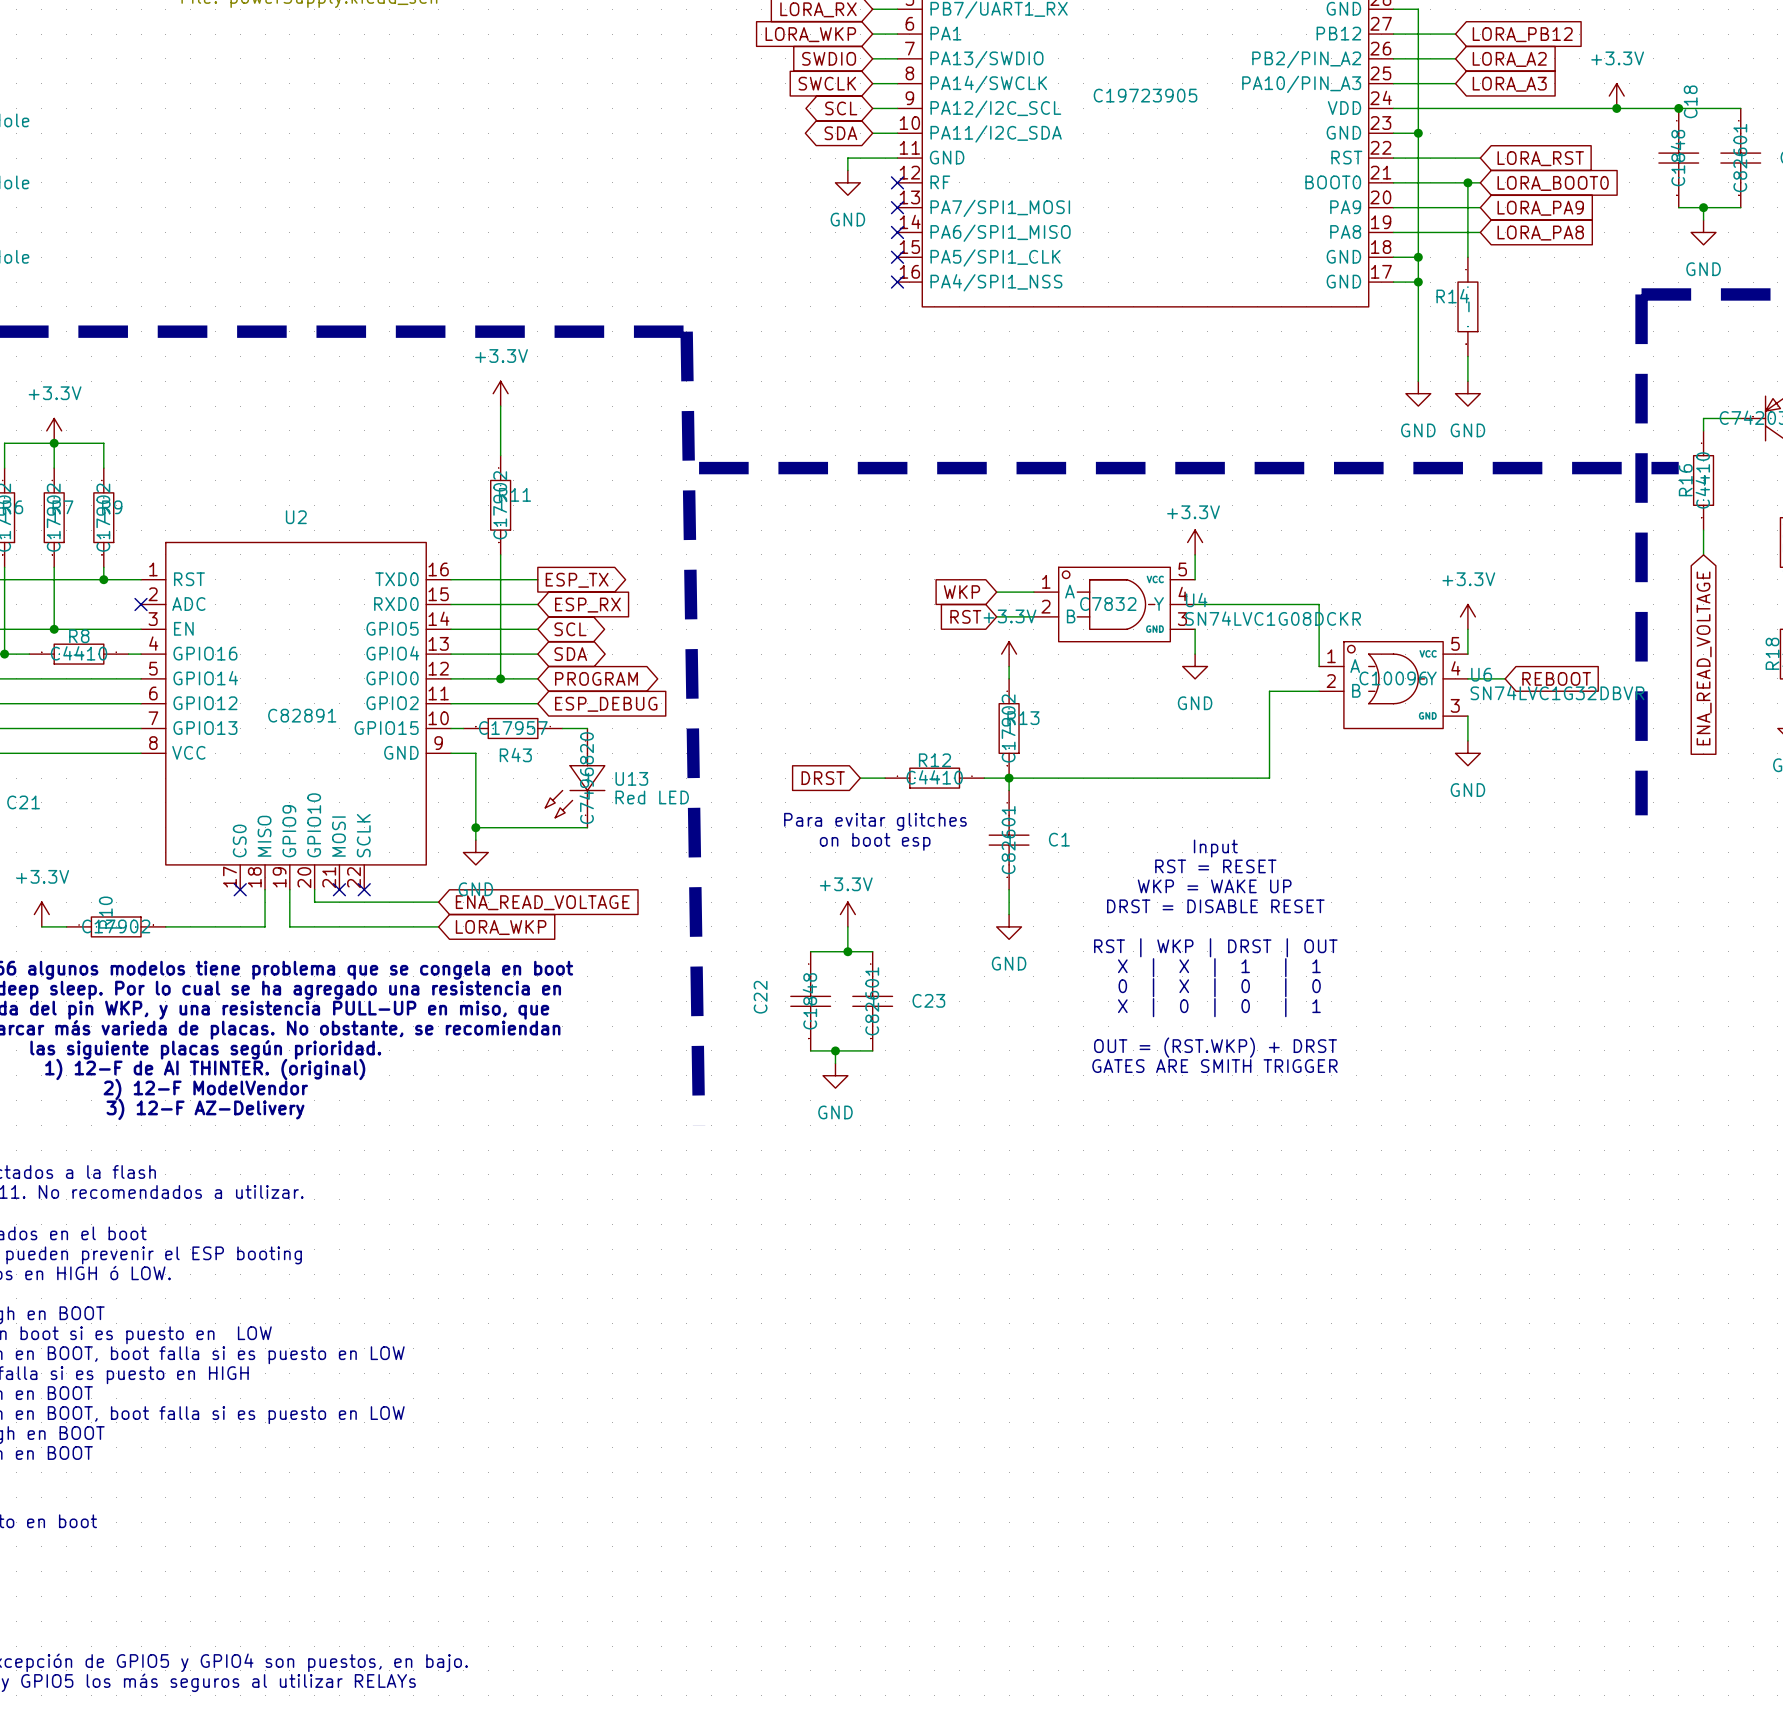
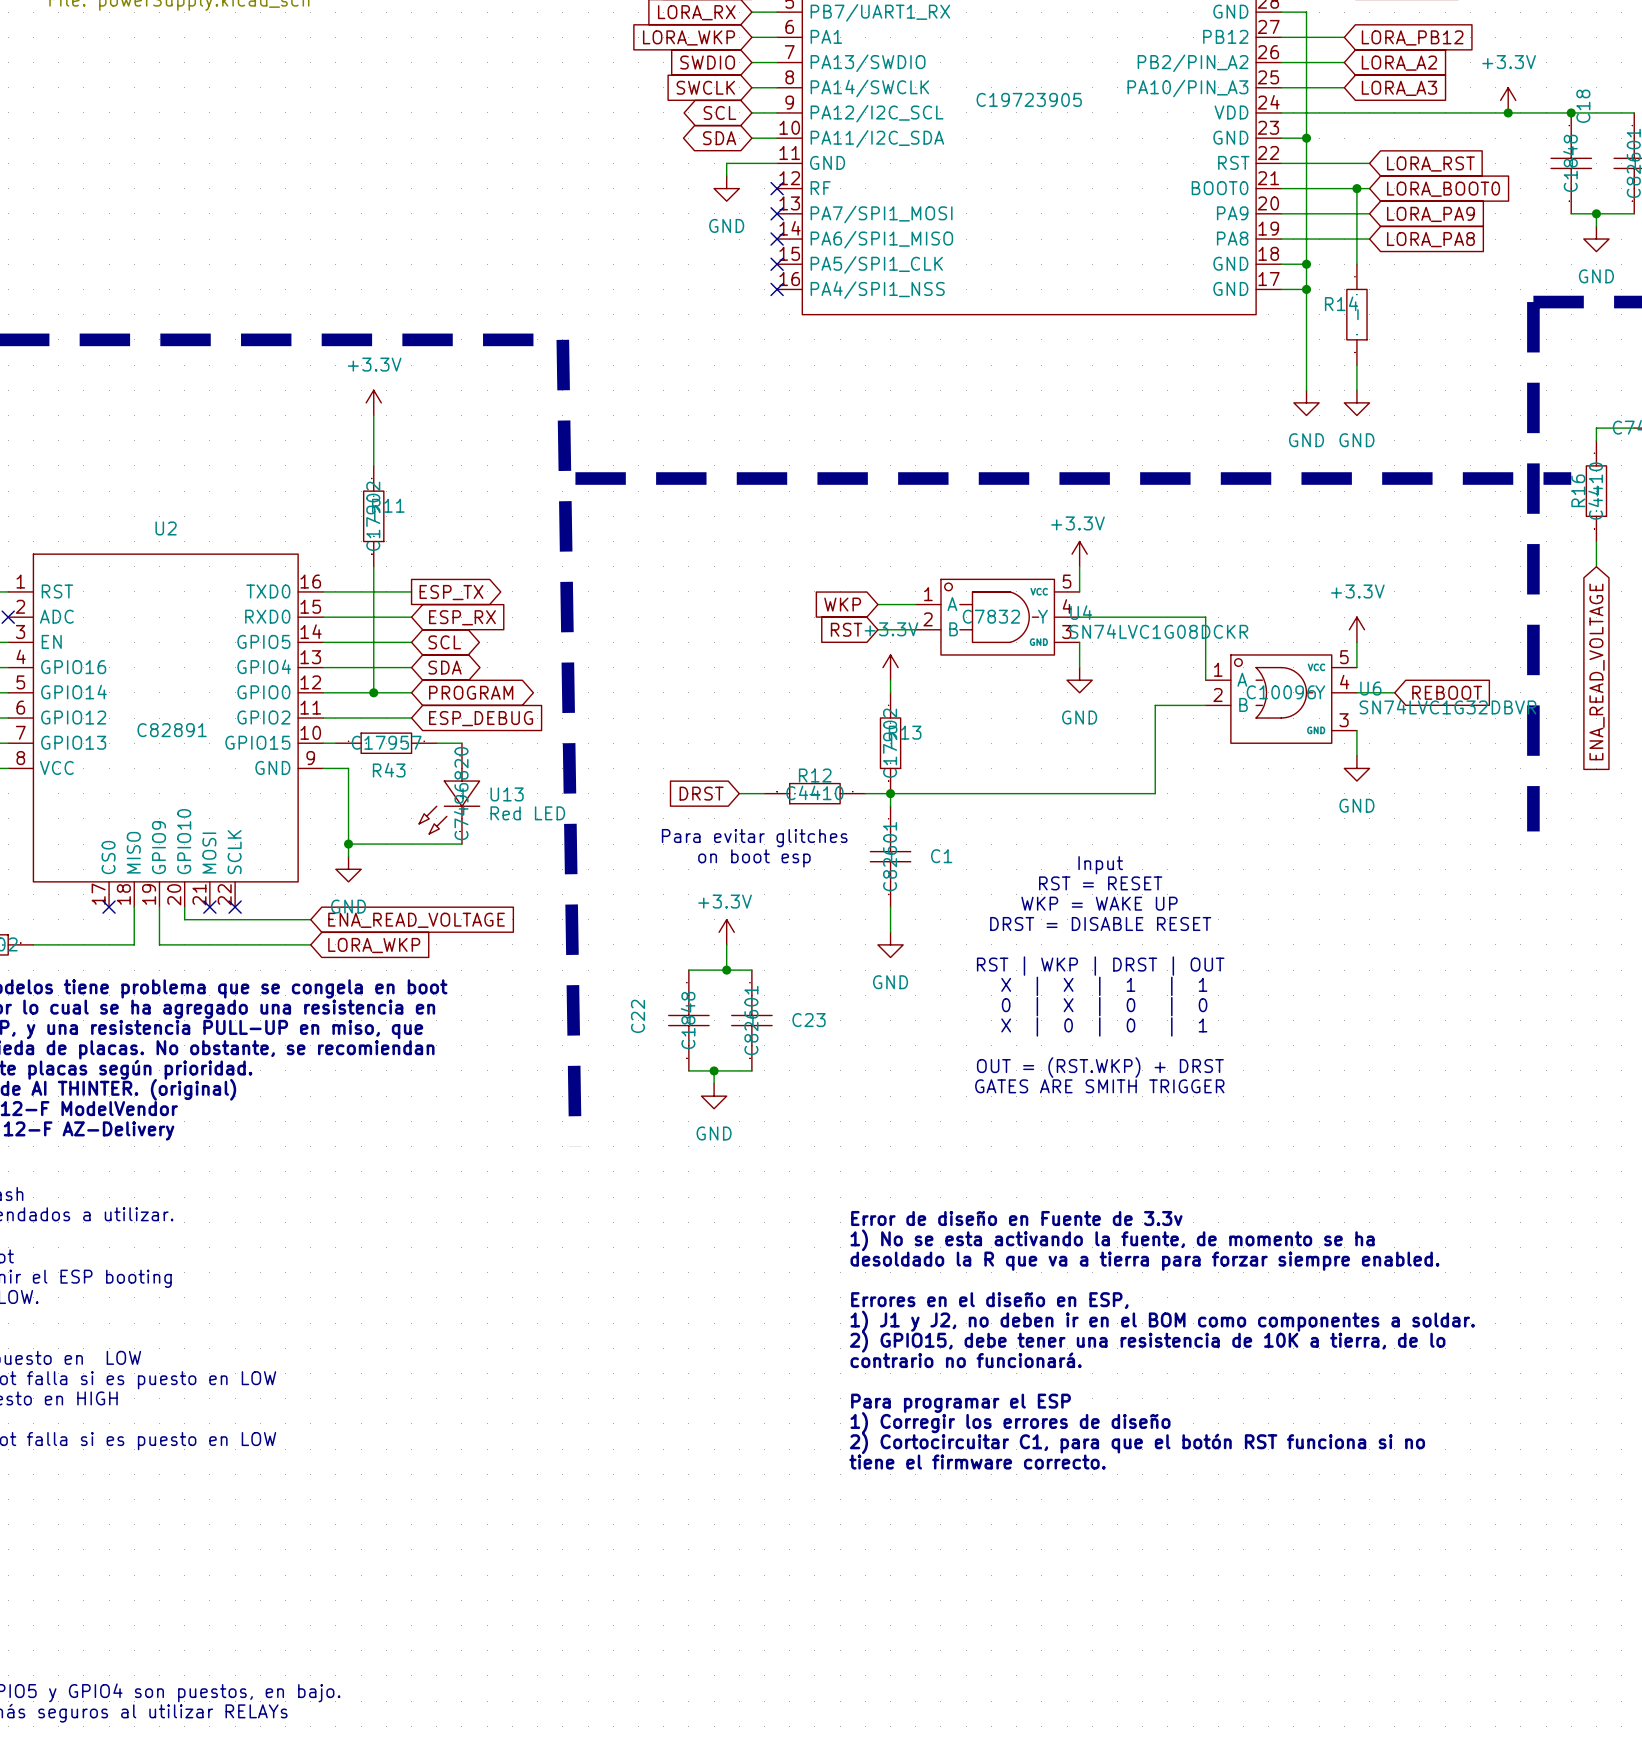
text: none -> Error de diseño en Fuente de 3.3v (1016, 1218)
text: none -> 1) No se esta activando la fuente, de momento se ha (1112, 1240)
text: none -> desoldado la R que va a tierra para forzar siempre enabled. (1144, 1261)
text: none -> Errores en el diseño en ESP, (989, 1300)
text: none -> 1) J1 y J2, no deben ir en el BOM como componentes a soldar. (1162, 1321)
text: none -> 2) GPIO15, debe tener una resistencia de 10K a tierra, de lo (1147, 1341)
text: none -> contrario no funcionará. (966, 1360)
text: none -> Para programar el ESP (961, 1403)
text: none -> 1) Corregir los errores de diseño (1010, 1422)
text: none -> 2) Cortocircuitar C1, para que el botón RST funciona si no (1137, 1443)
text: none -> tiene el firmware correcto. (977, 1462)

